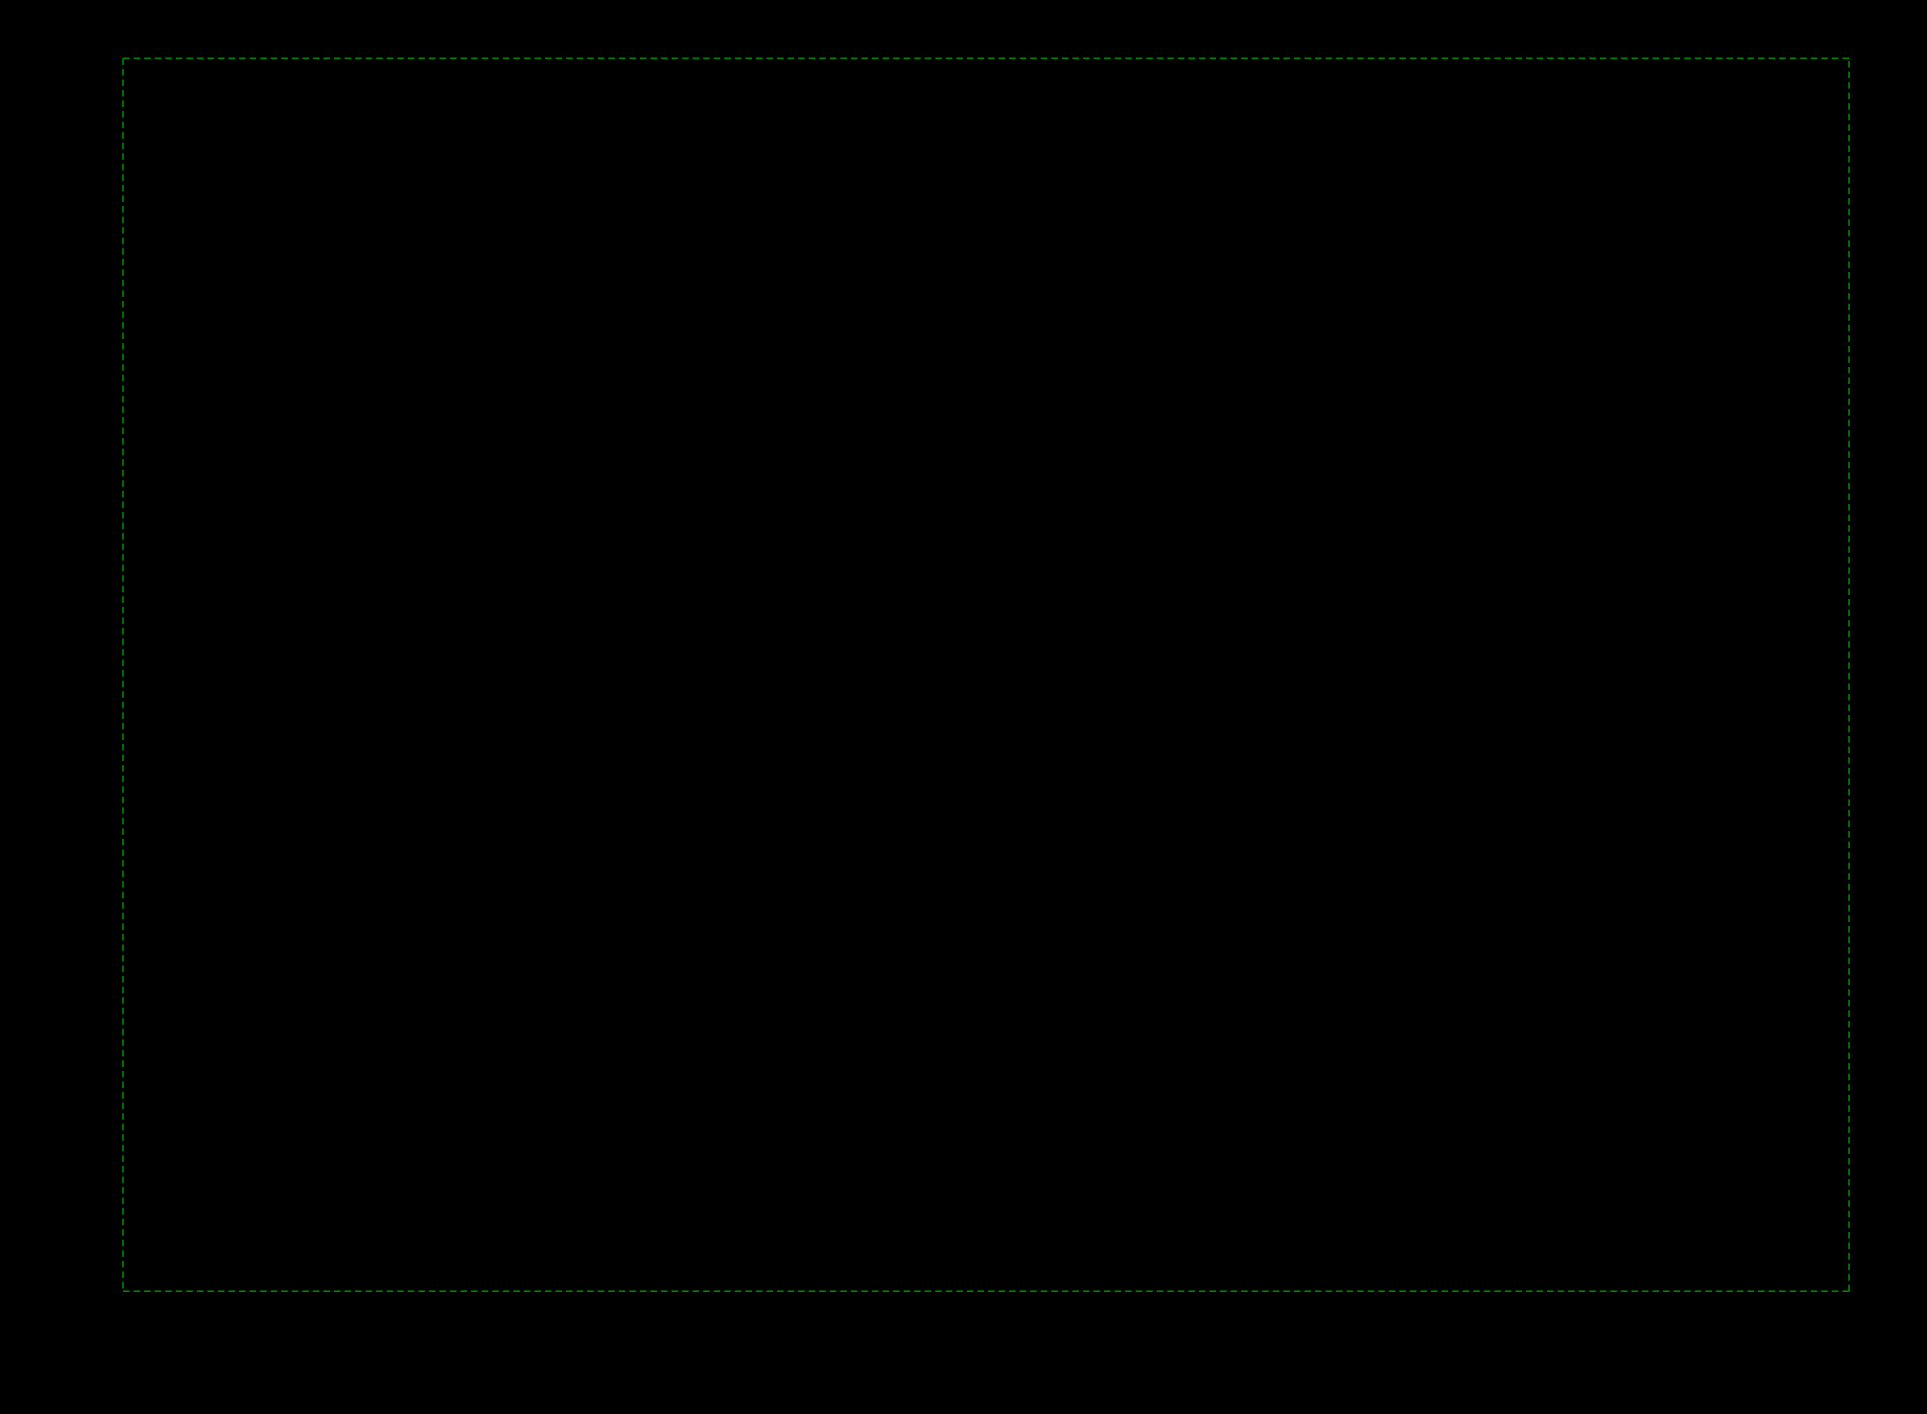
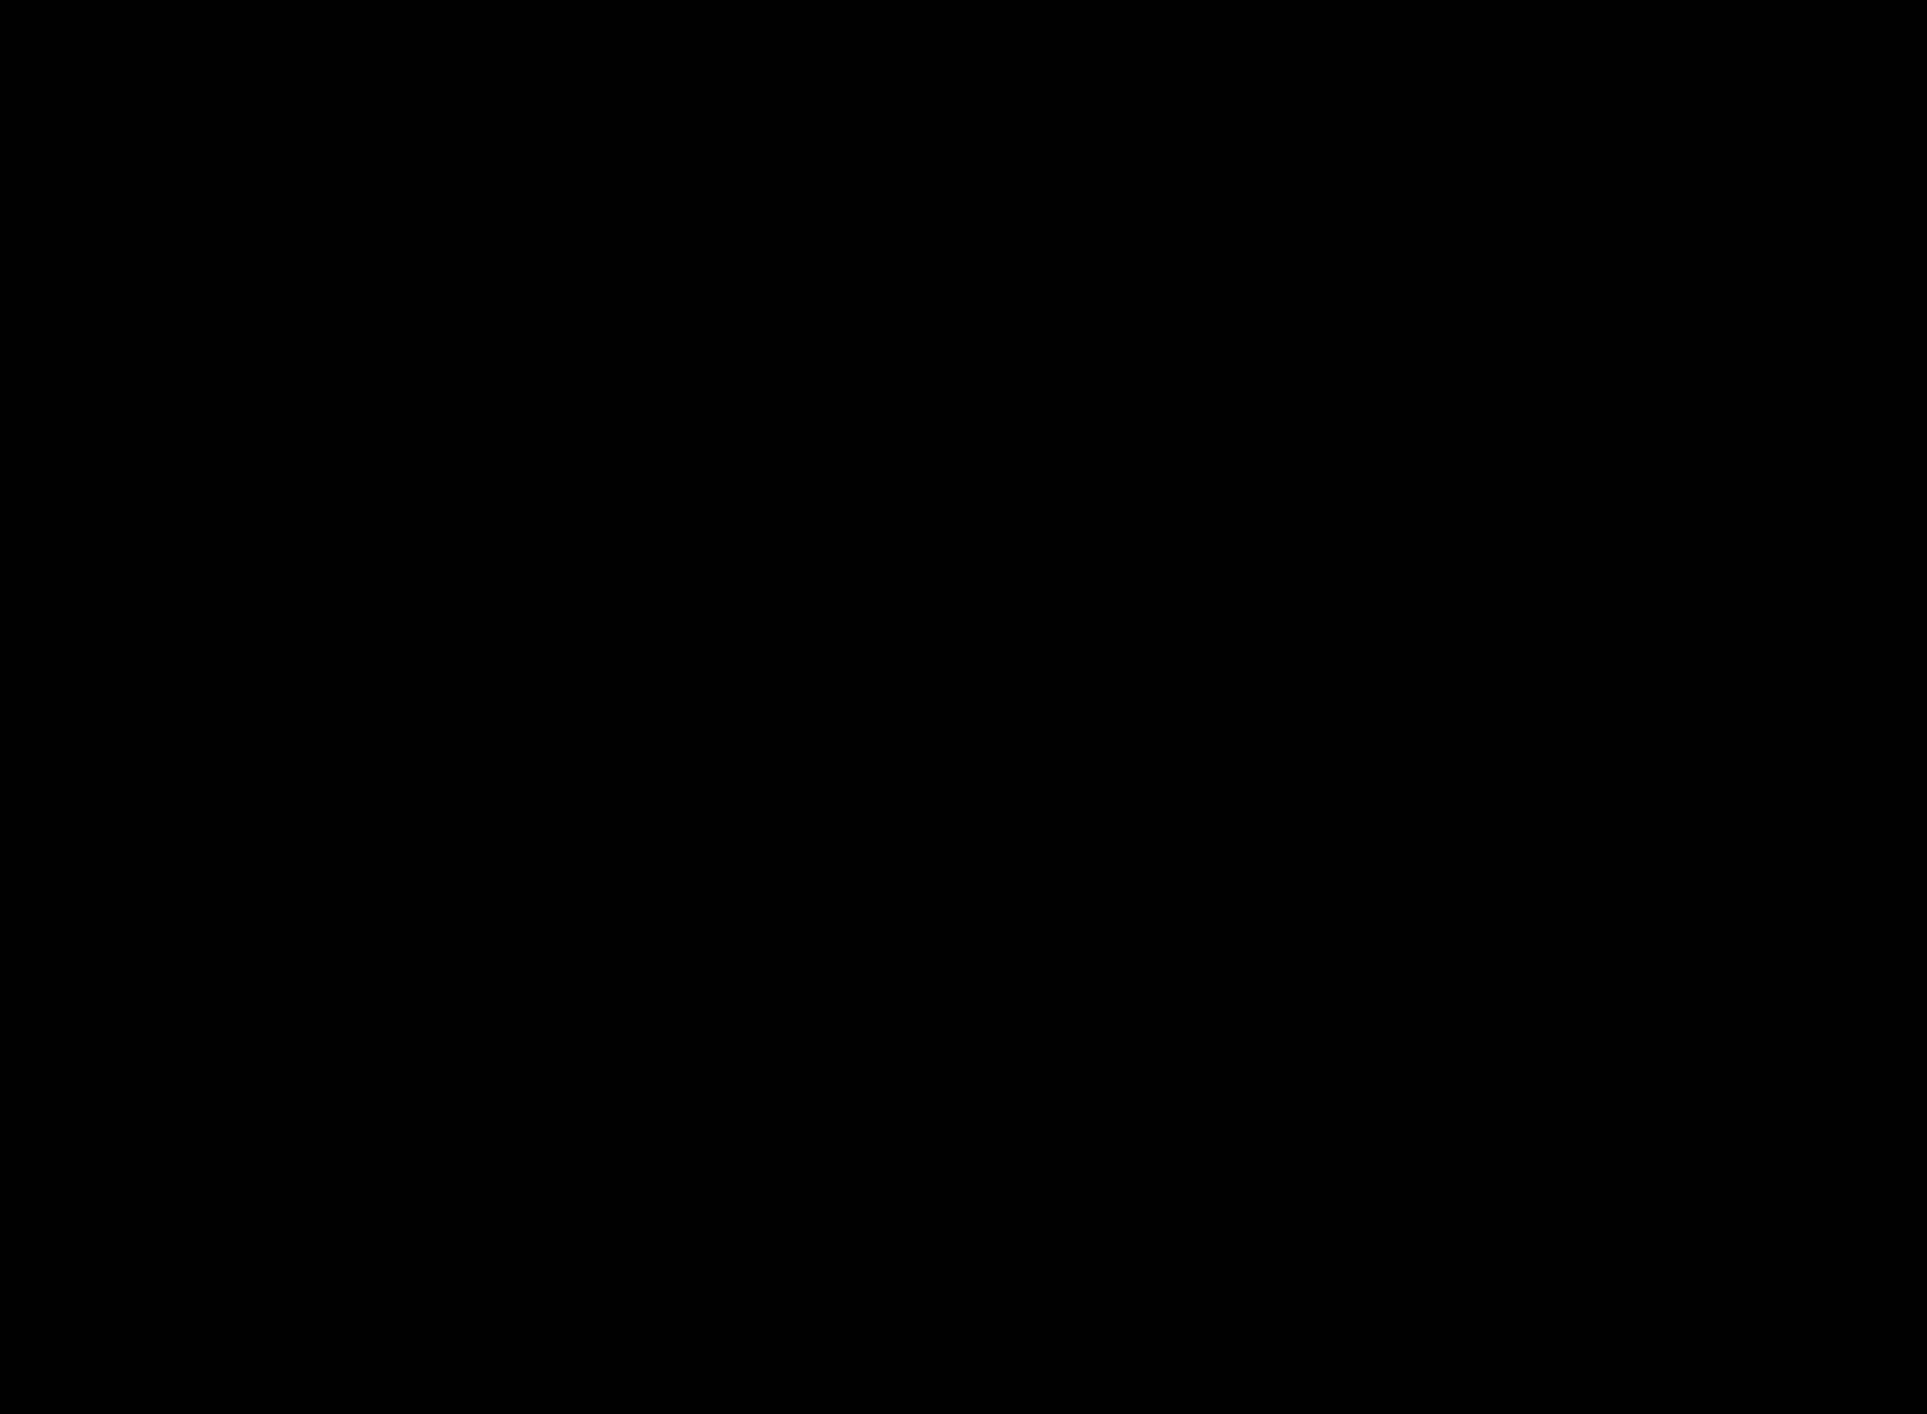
bottom zone outline: (1849, 58) (122, 58) (122, 1291) (1849, 1291) (1849, 58) -> none

